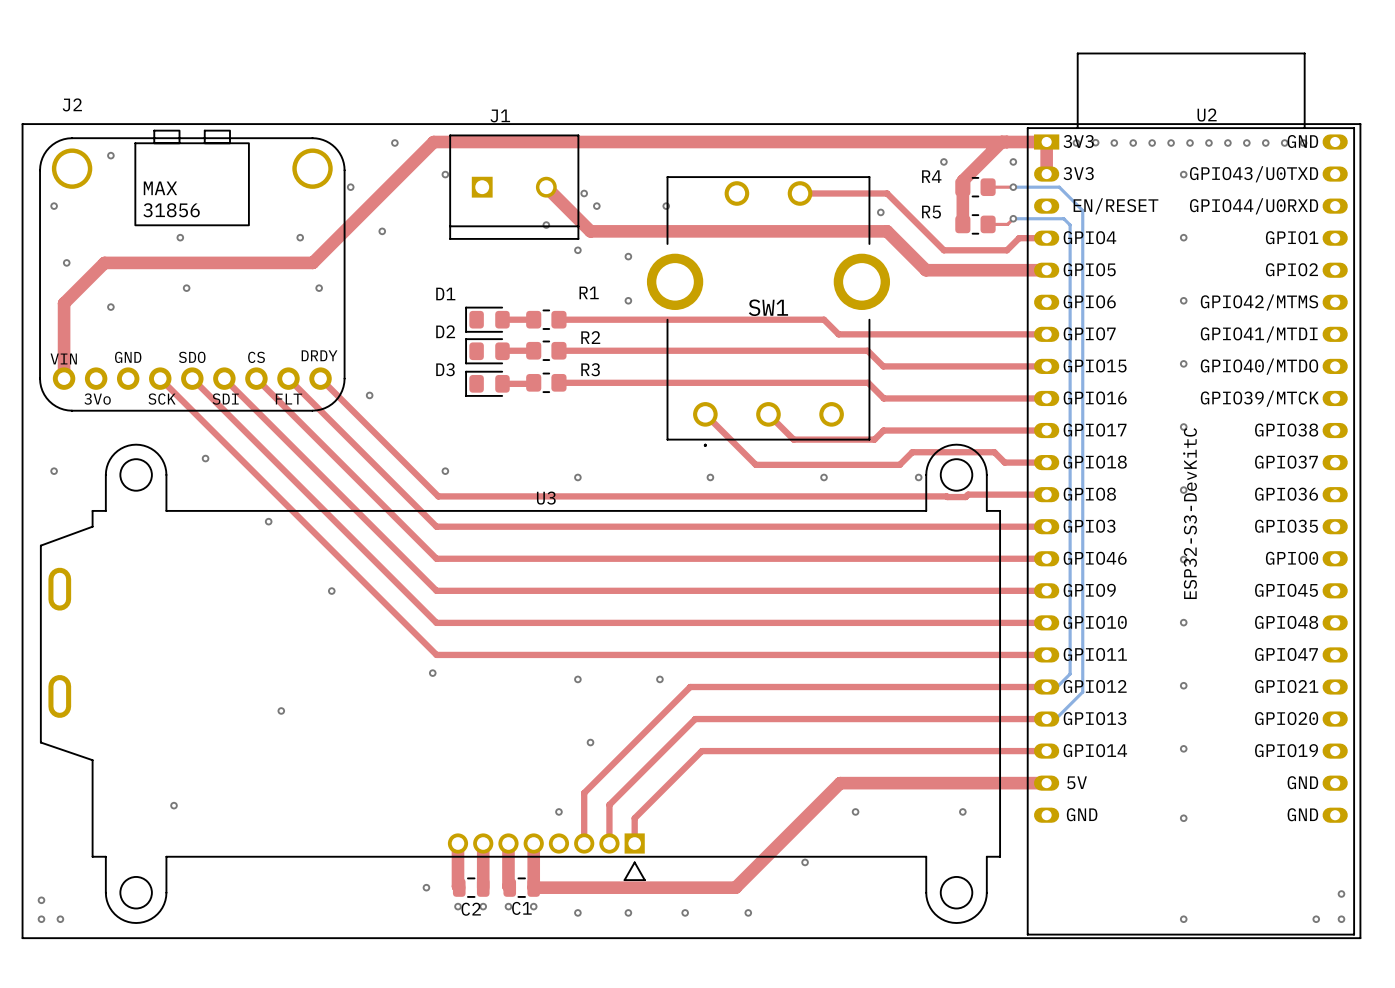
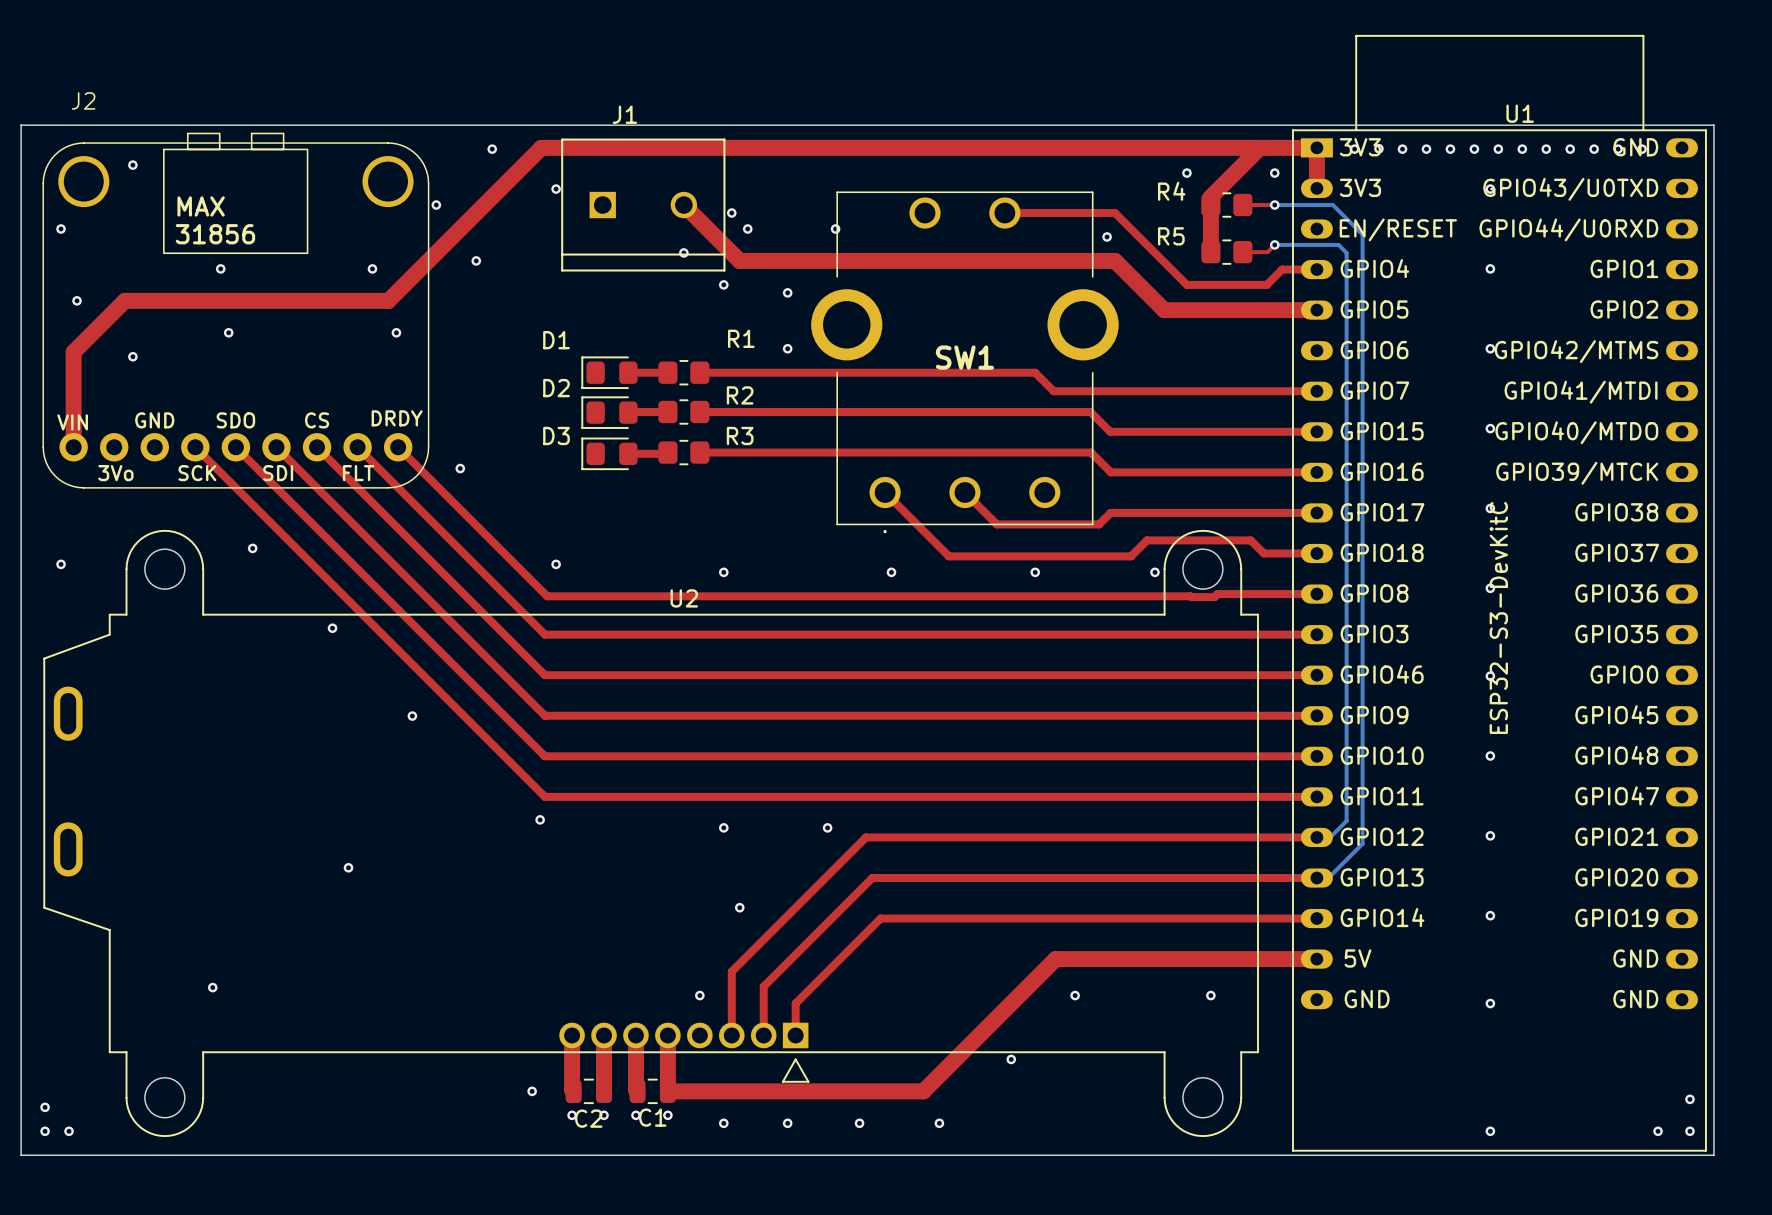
U2 name: U2 (1207, 115) -> U1 (1520, 113)
U3 name: U3 (546, 498) -> U2 (684, 598)

